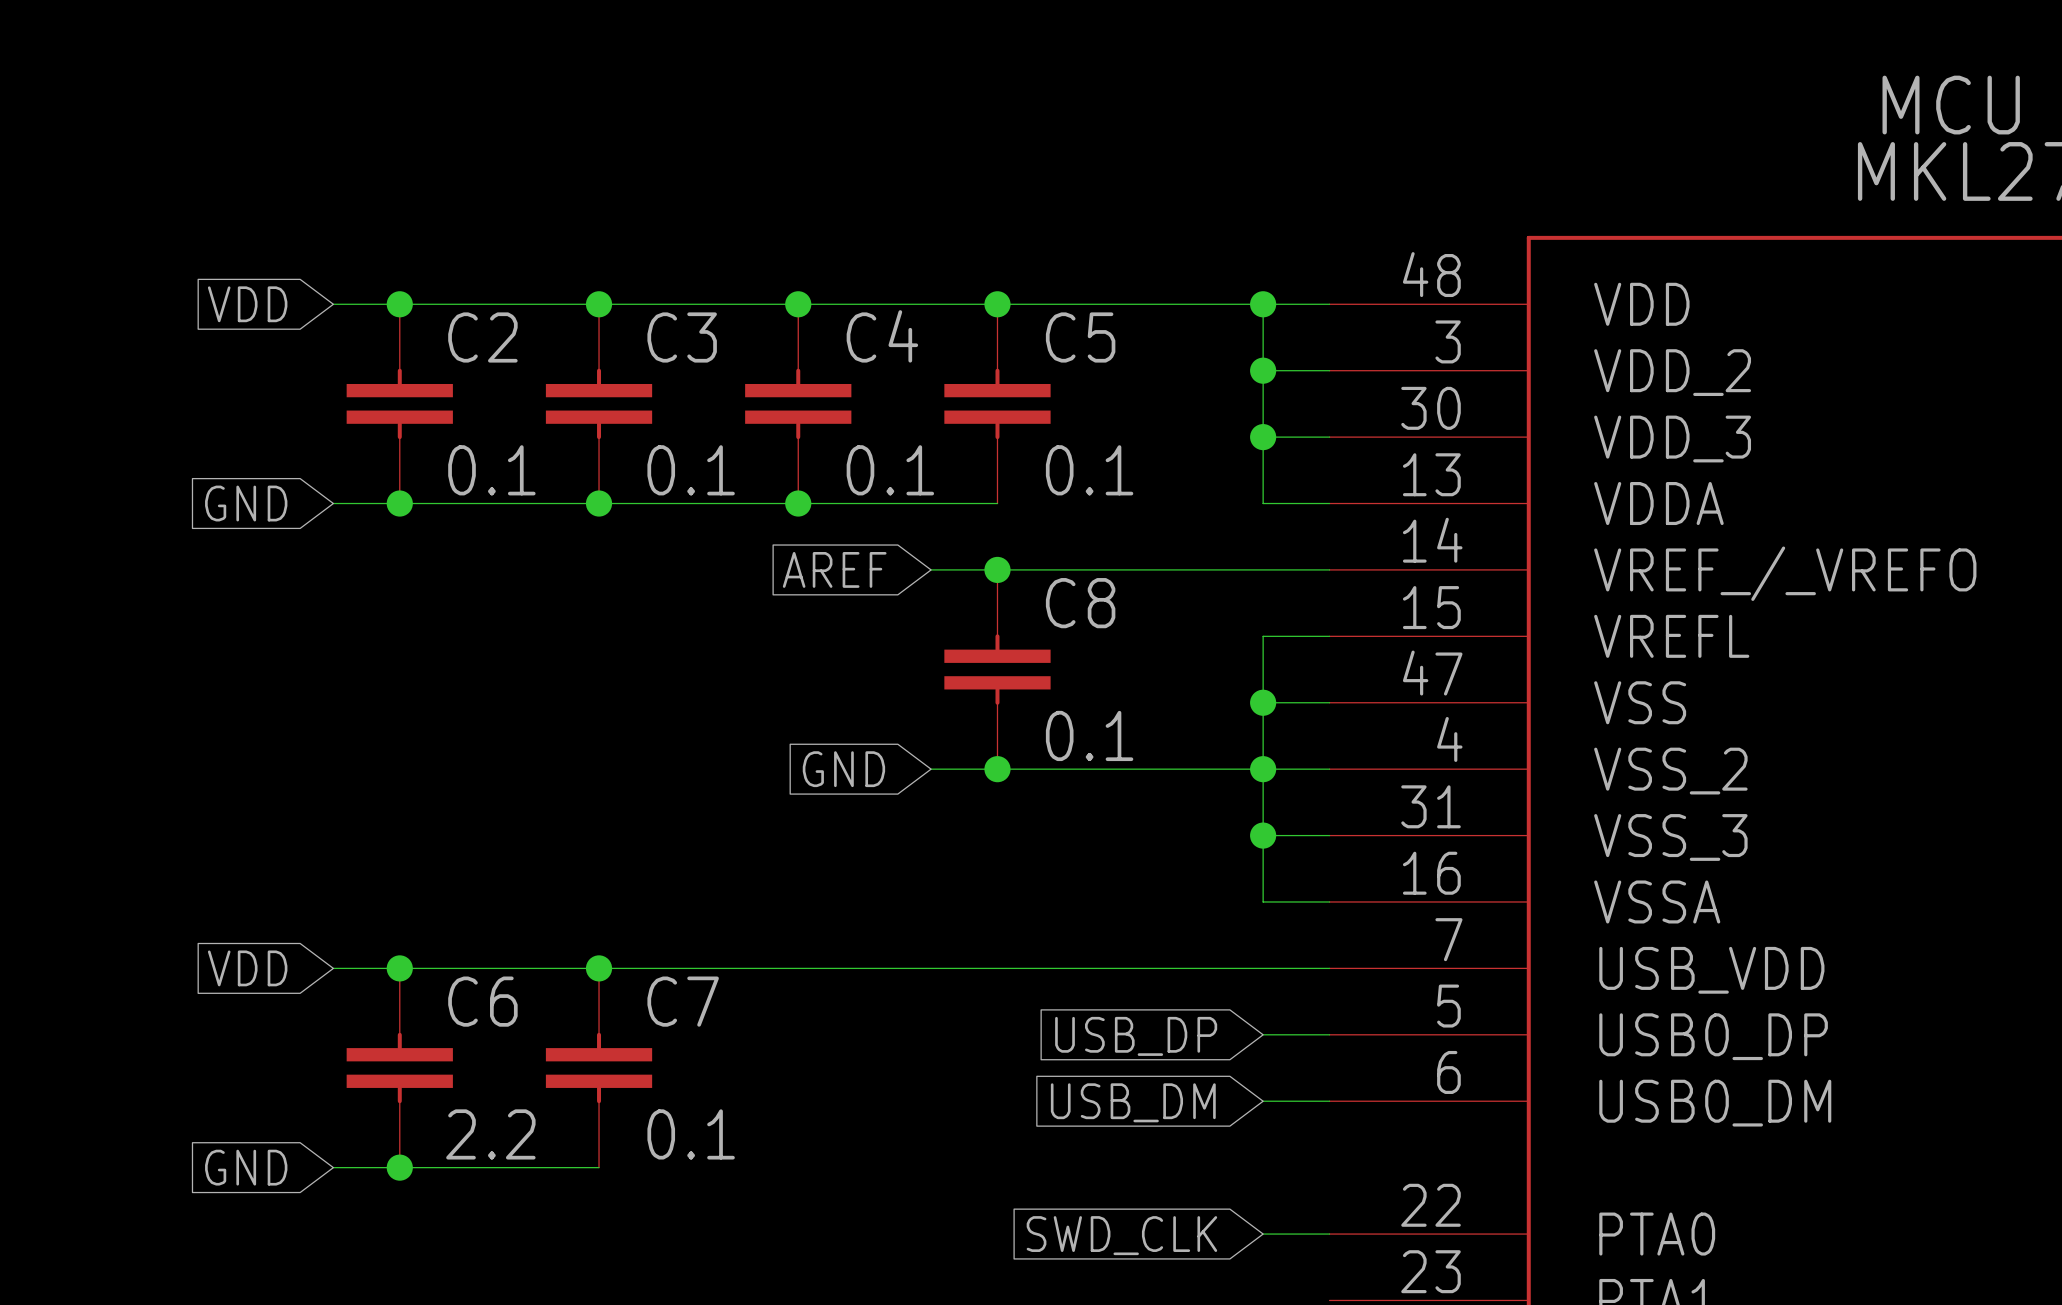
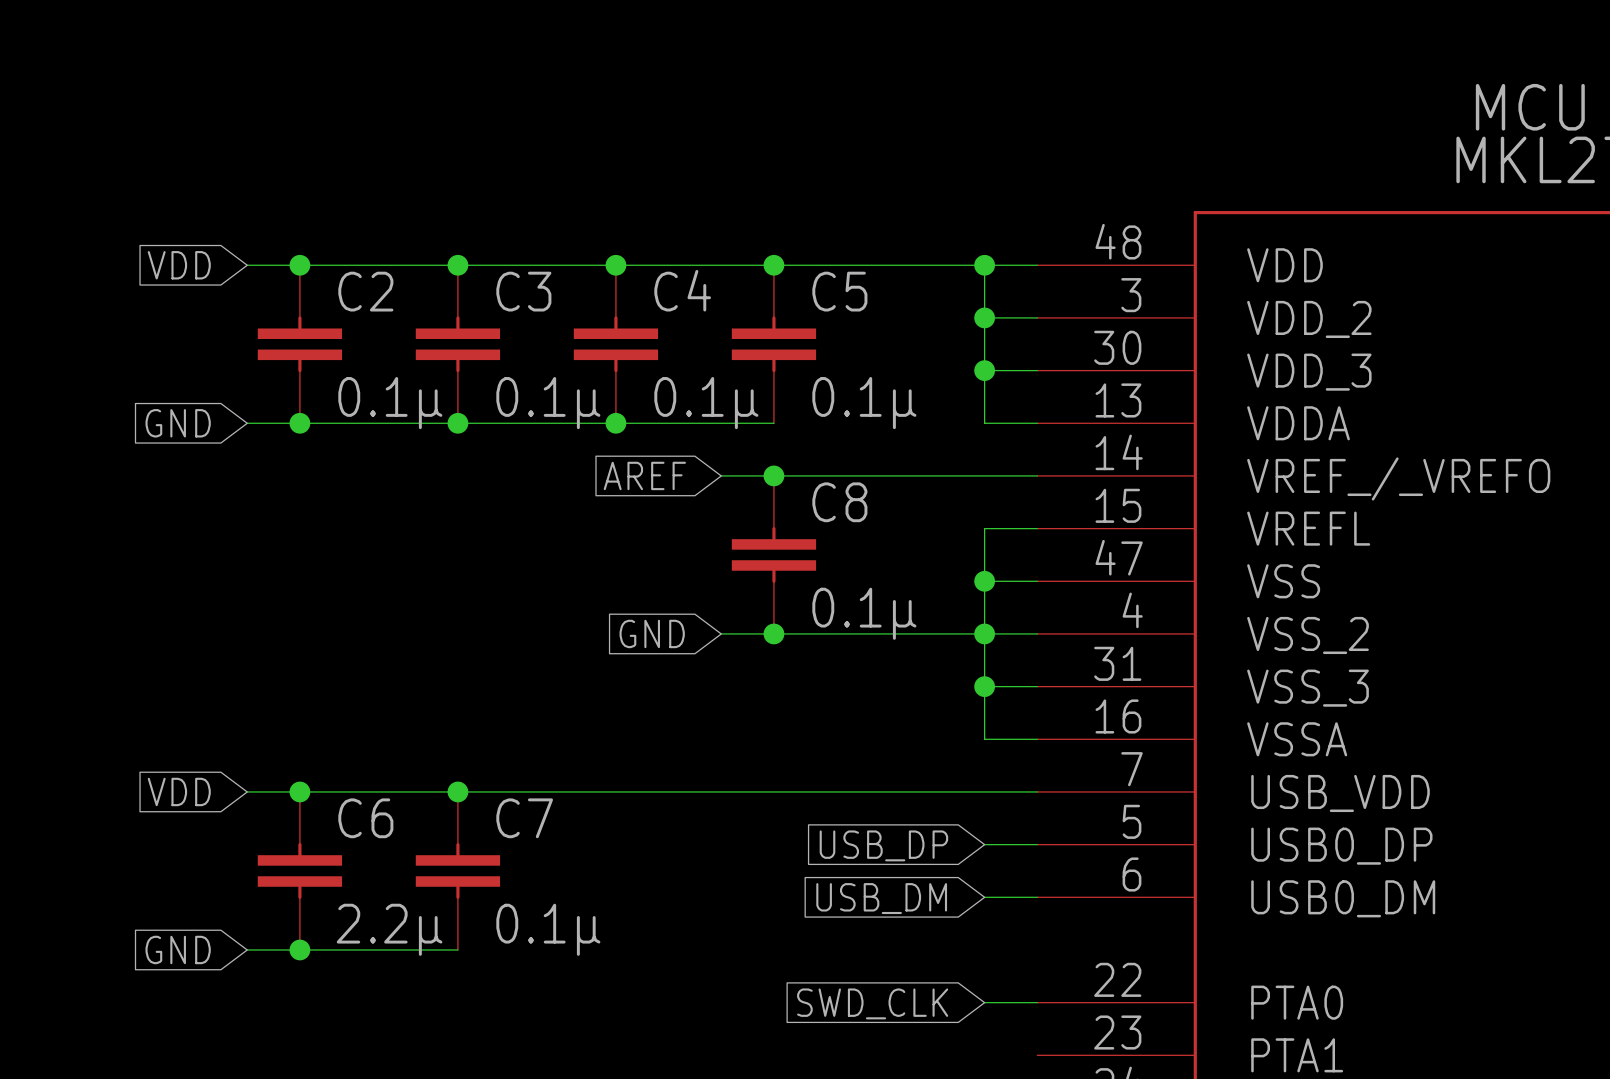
C2 value: 0.1 (491, 470) -> 0.1µ (390, 403)
C3 value: 0.1 (691, 470) -> 0.1µ (548, 403)
C4 value: 0.1 (890, 470) -> 0.1µ (706, 403)
C5 value: 0.1 (1089, 470) -> 0.1µ (864, 403)
C8 value: 0.1 (1089, 735) -> 0.1µ (864, 613)
C6 value: 2.2 (490, 1134) -> 2.2µ (389, 929)
C7 value: 0.1 (691, 1134) -> 0.1µ (548, 929)

